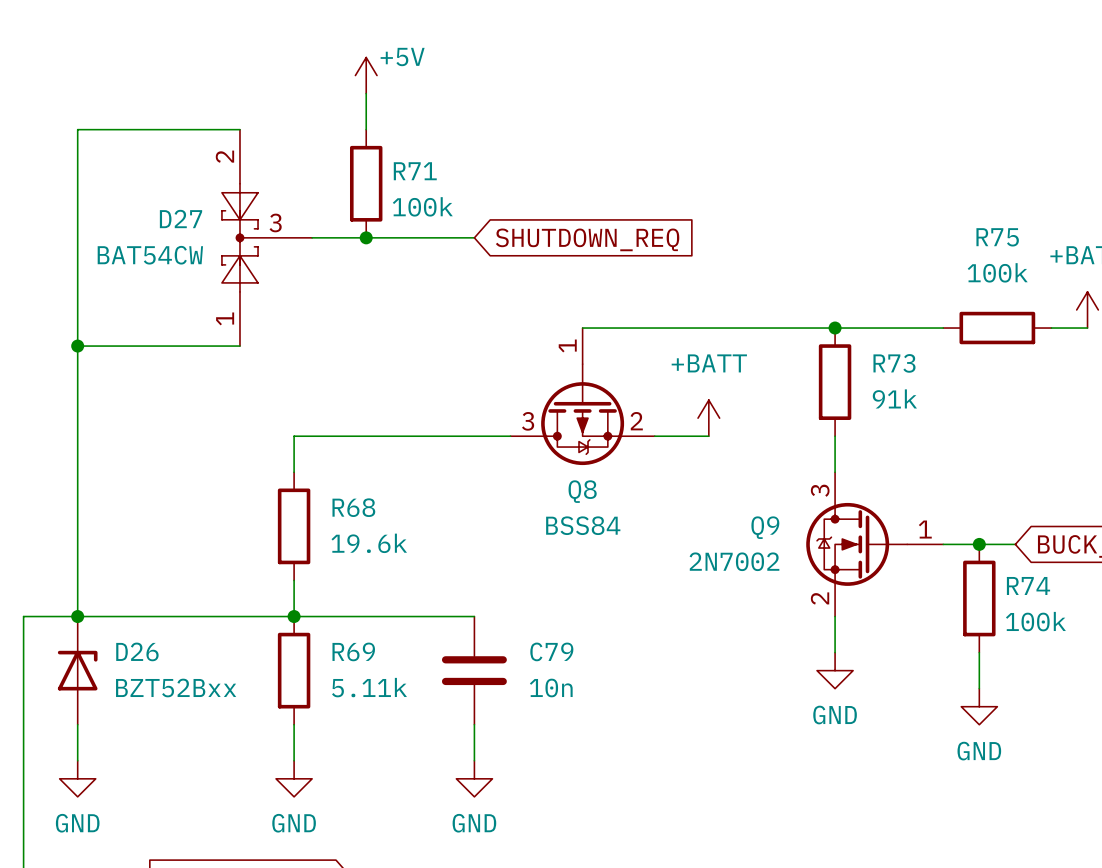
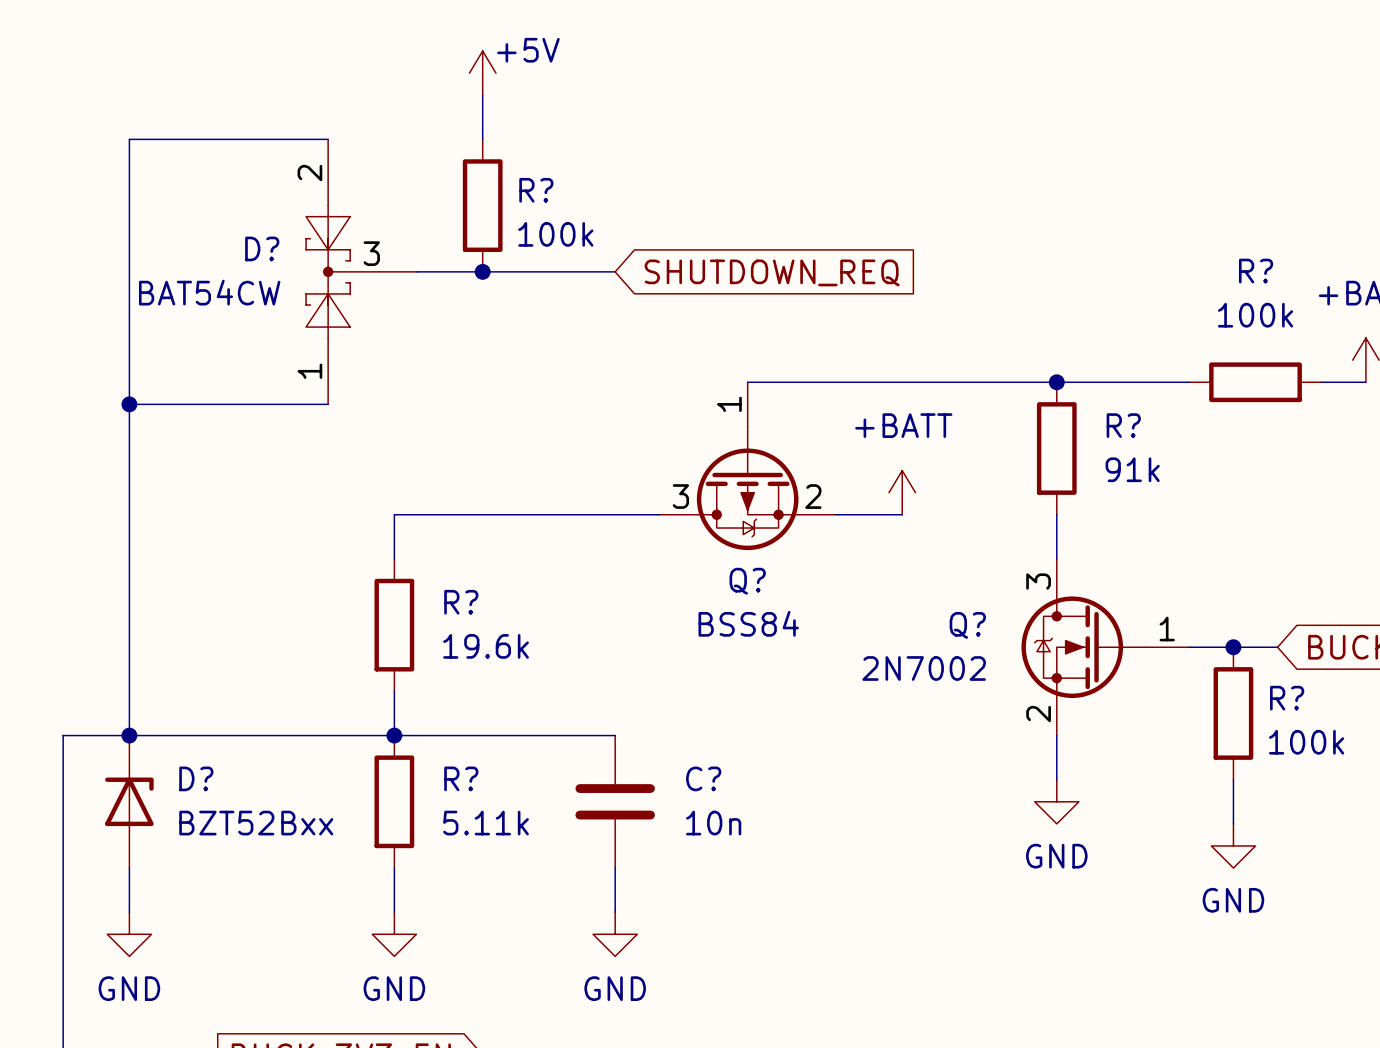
R71 name: R71 (415, 171) -> R? (536, 190)
D27 name: D27 (181, 218) -> D? (262, 248)
R75 name: R75 (997, 237) -> R? (1256, 271)
R73 name: R73 (894, 363) -> R? (1123, 425)
Q8 name: Q8 (582, 491) -> Q? (747, 581)
R68 name: R68 (353, 507) -> R? (461, 602)
Q9 name: Q9 (765, 527) -> Q? (967, 625)
R74 name: R74 (1028, 585) -> R? (1287, 698)
D26 name: D26 (137, 651) -> D? (196, 778)
R69 name: R69 (353, 651) -> R? (461, 778)
C79 name: C79 (551, 651) -> C? (703, 778)

